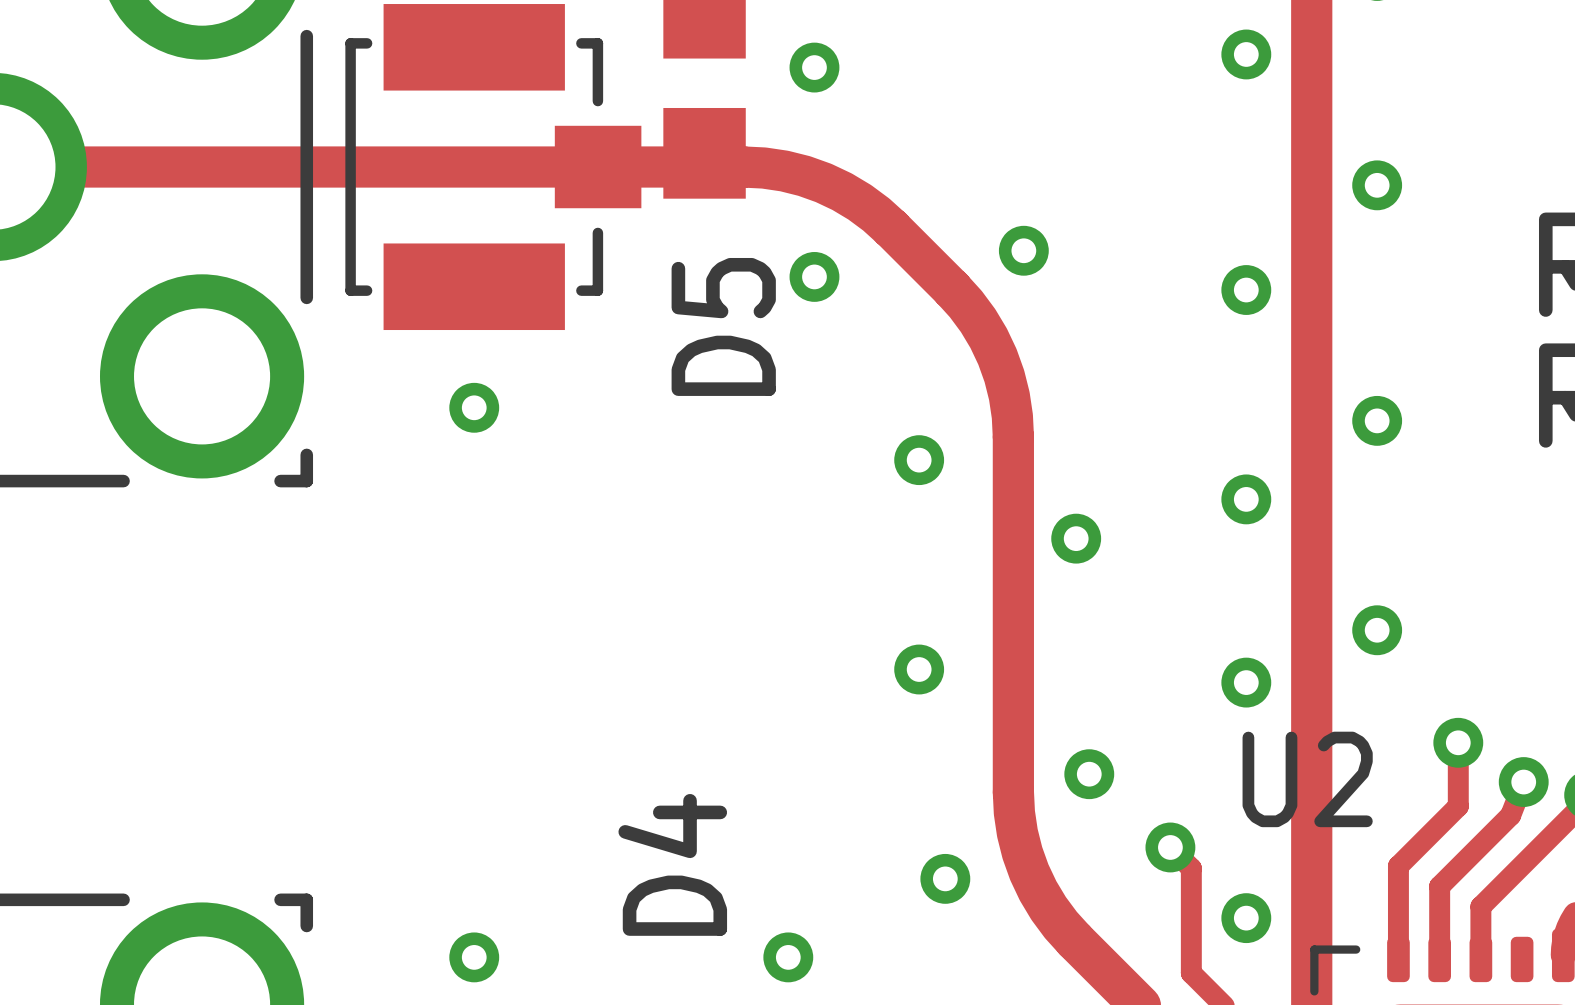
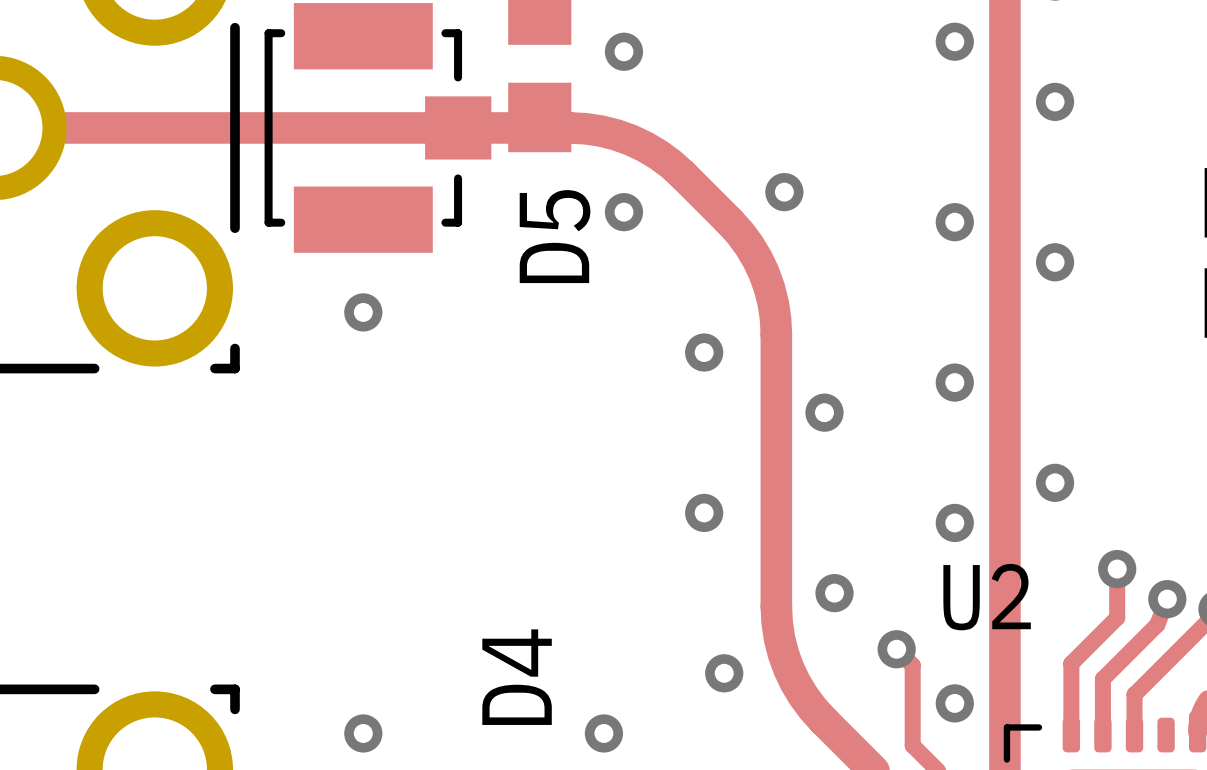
via position: (1377, 185) -> (1055, 101)
via: none -> (1055, 262)
via: (1377, 420) -> none

